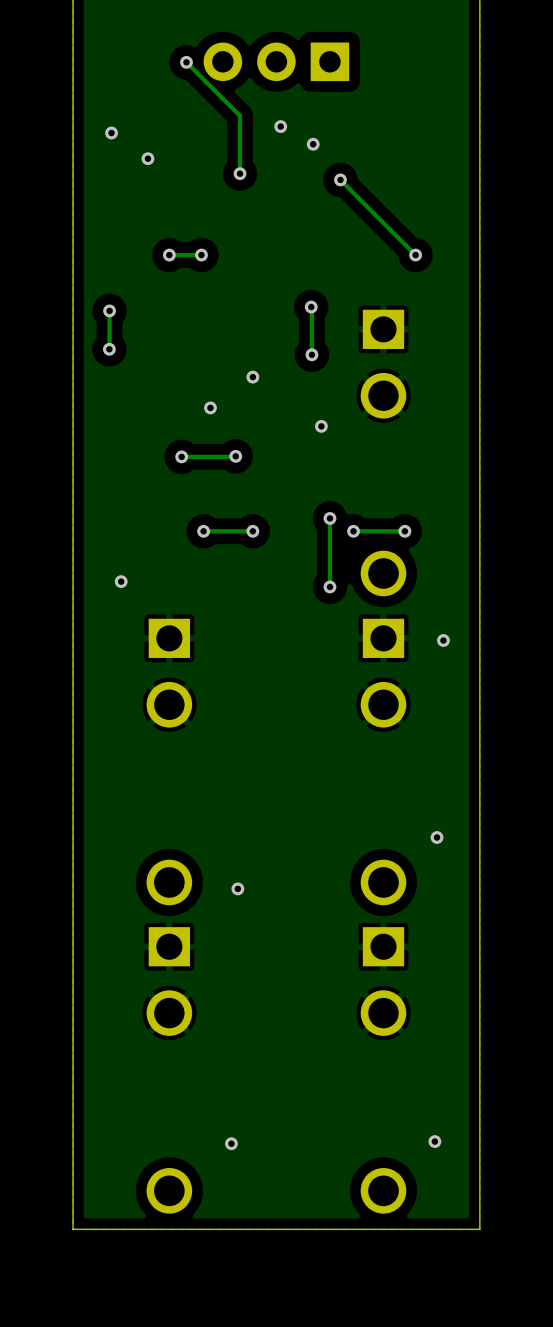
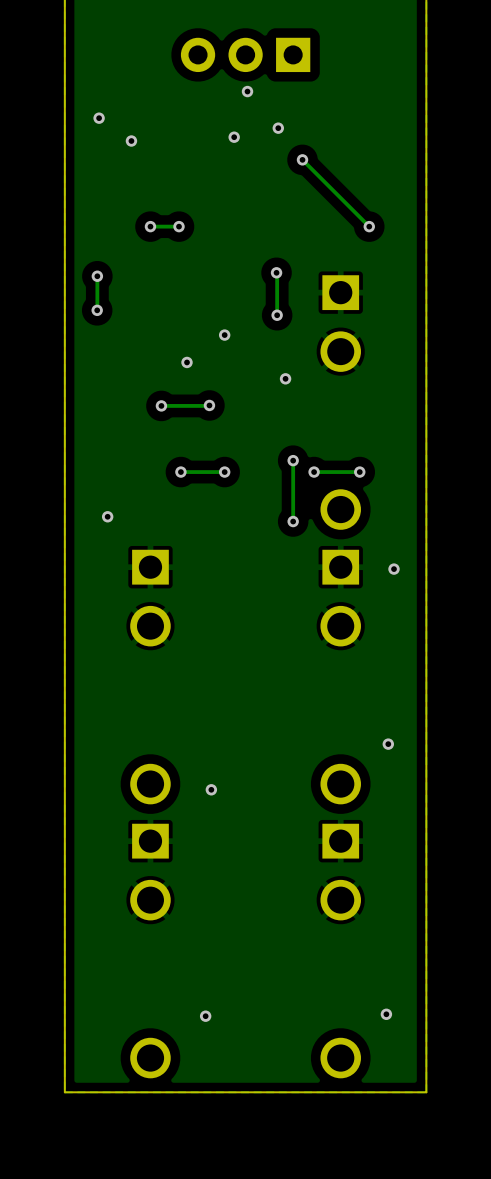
track: (186, 62) (240, 115) (240, 173) -> none
via: (186, 62) -> none
via: none -> (247, 91)
via: (280, 126) -> none
via: none -> (234, 137)
via: (240, 173) -> none

